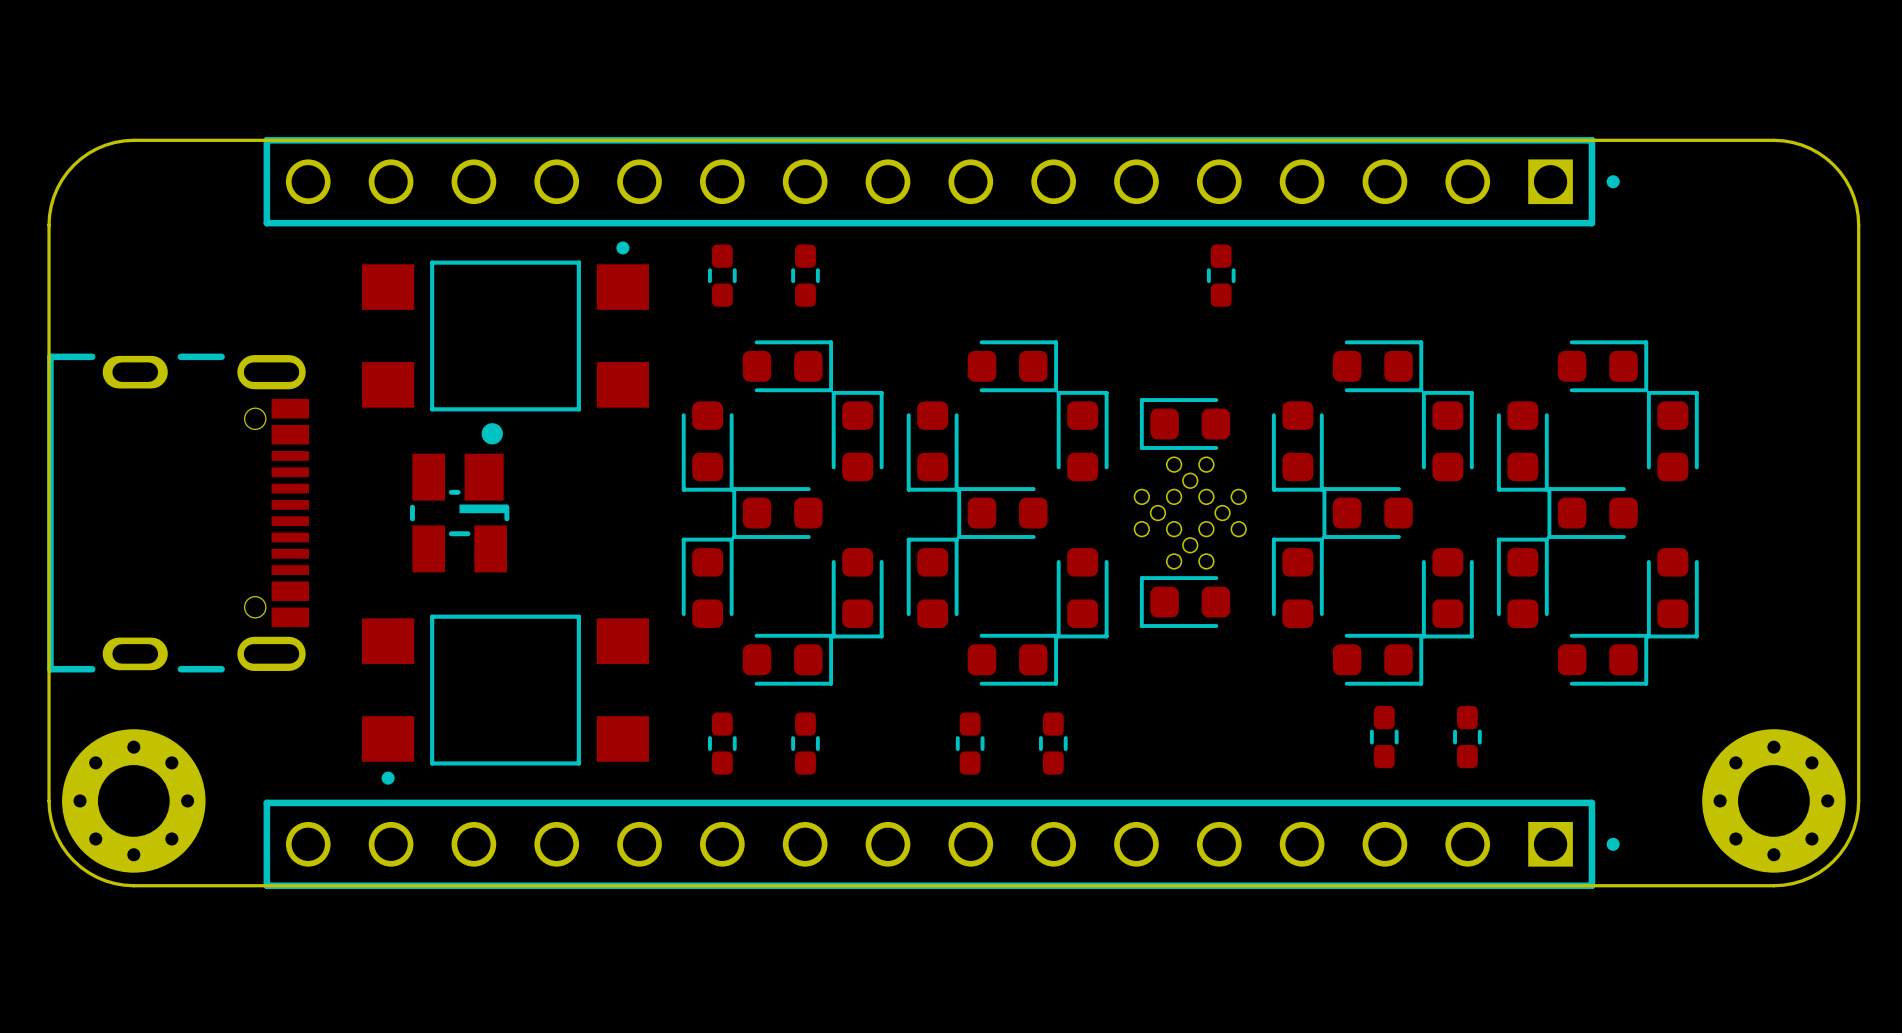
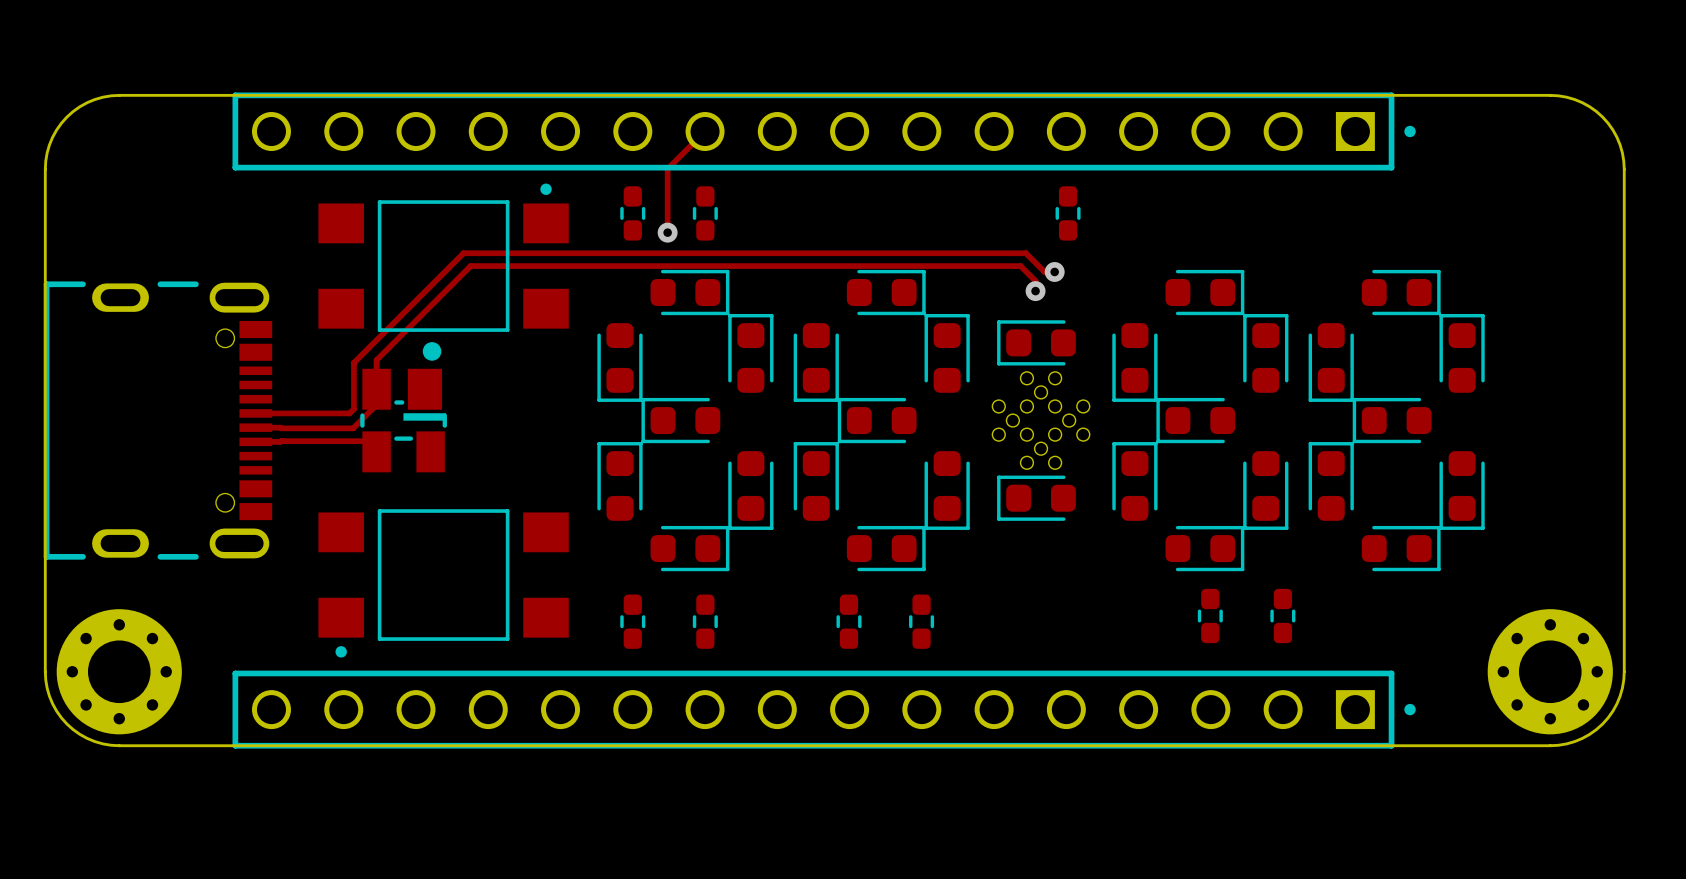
track: none -> (705, 131) (667, 168) (667, 232)
via: none -> (667, 232)
track: none -> (1054, 271) (1044, 271) (1025, 253) (463, 253) (353, 362) (353, 409) (349, 413) (255, 413)
via: none -> (1054, 271)
track: none -> (1035, 291) (1035, 281) (1020, 266) (470, 266) (376, 360) (376, 404) (353, 428) (255, 427)
via: none -> (1035, 291)
track: none -> (255, 441) (365, 441) (376, 451)

